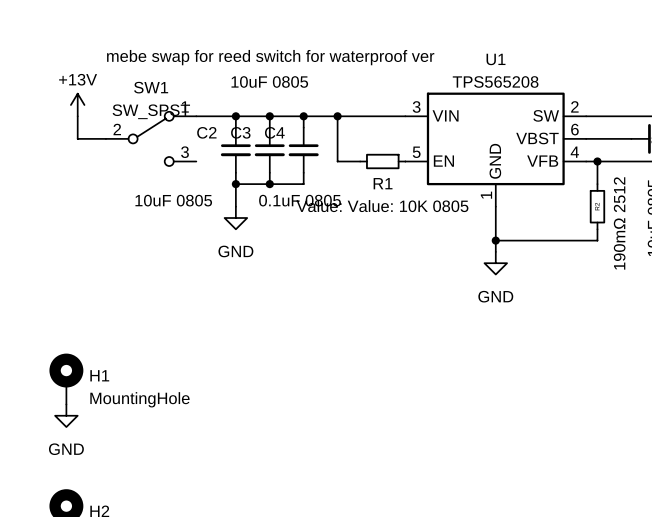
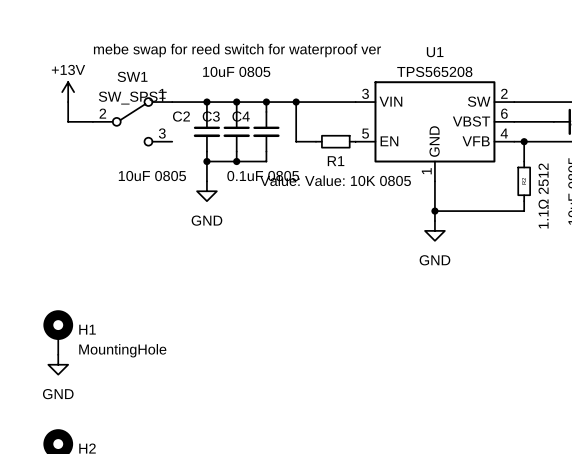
part value: 190mΩ 2512 (619, 223) -> 1.1Ω 2512 (543, 196)

